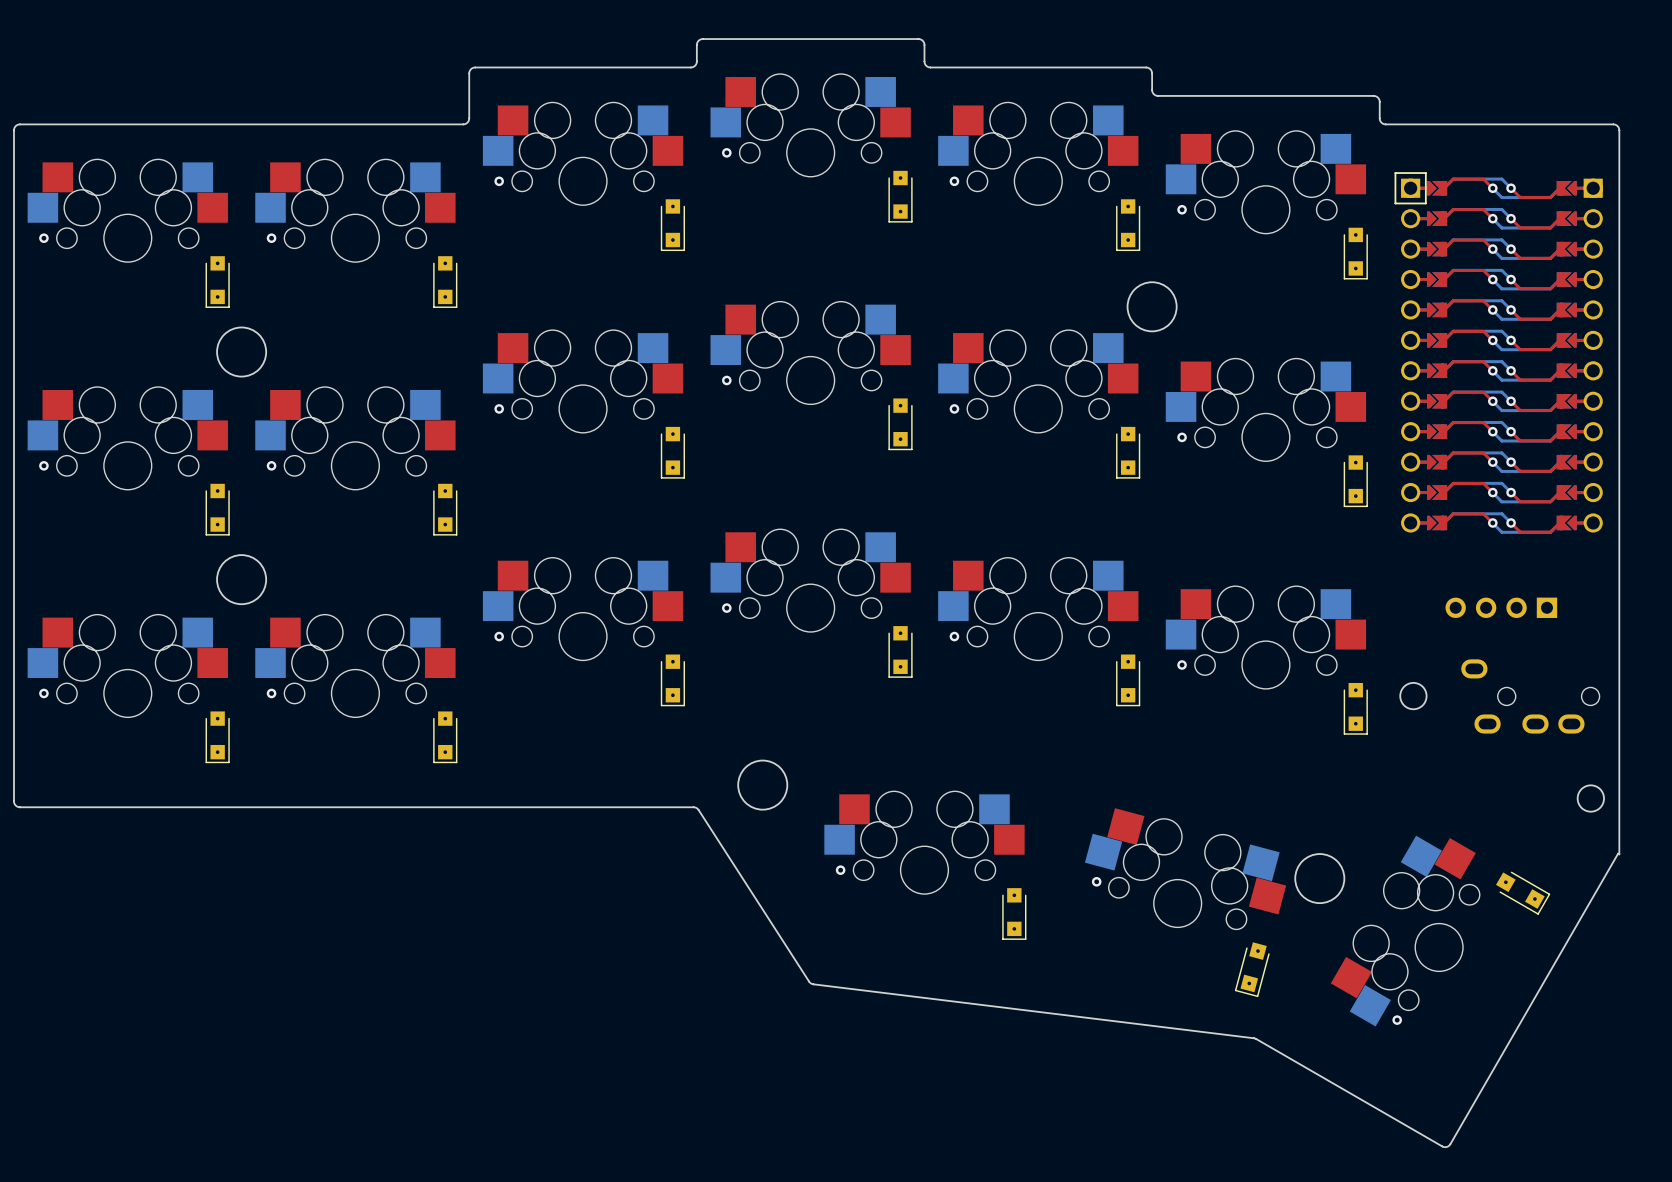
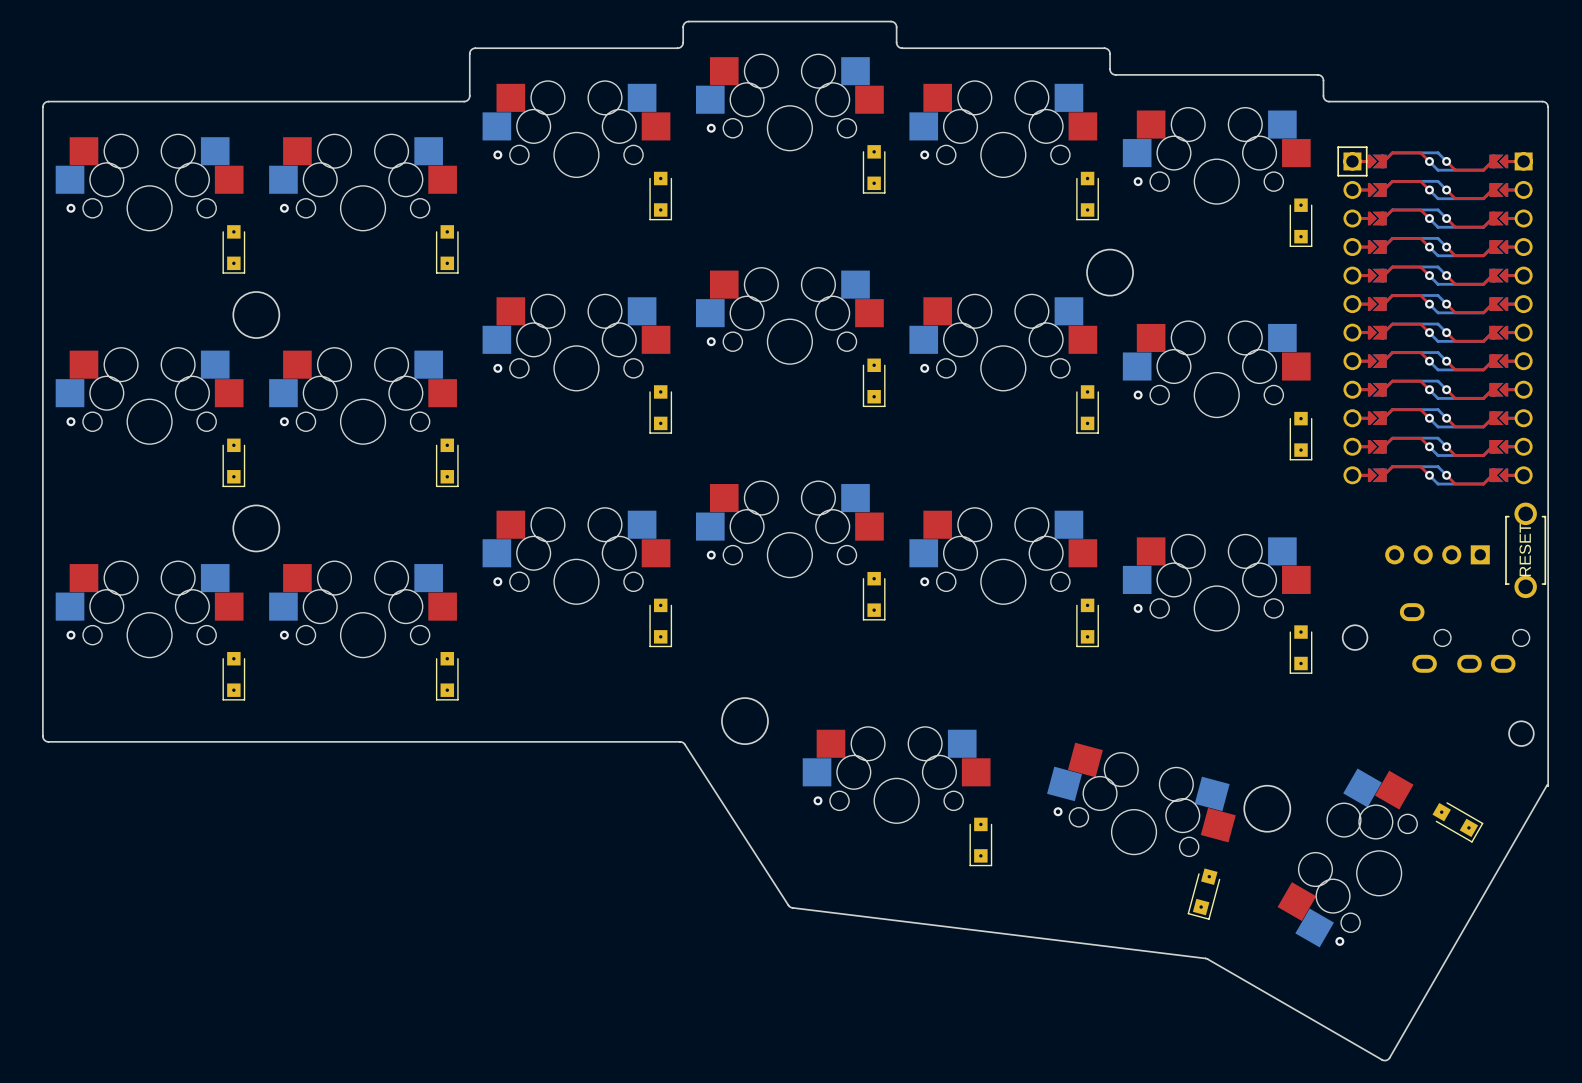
part: none -> (1525, 550)

